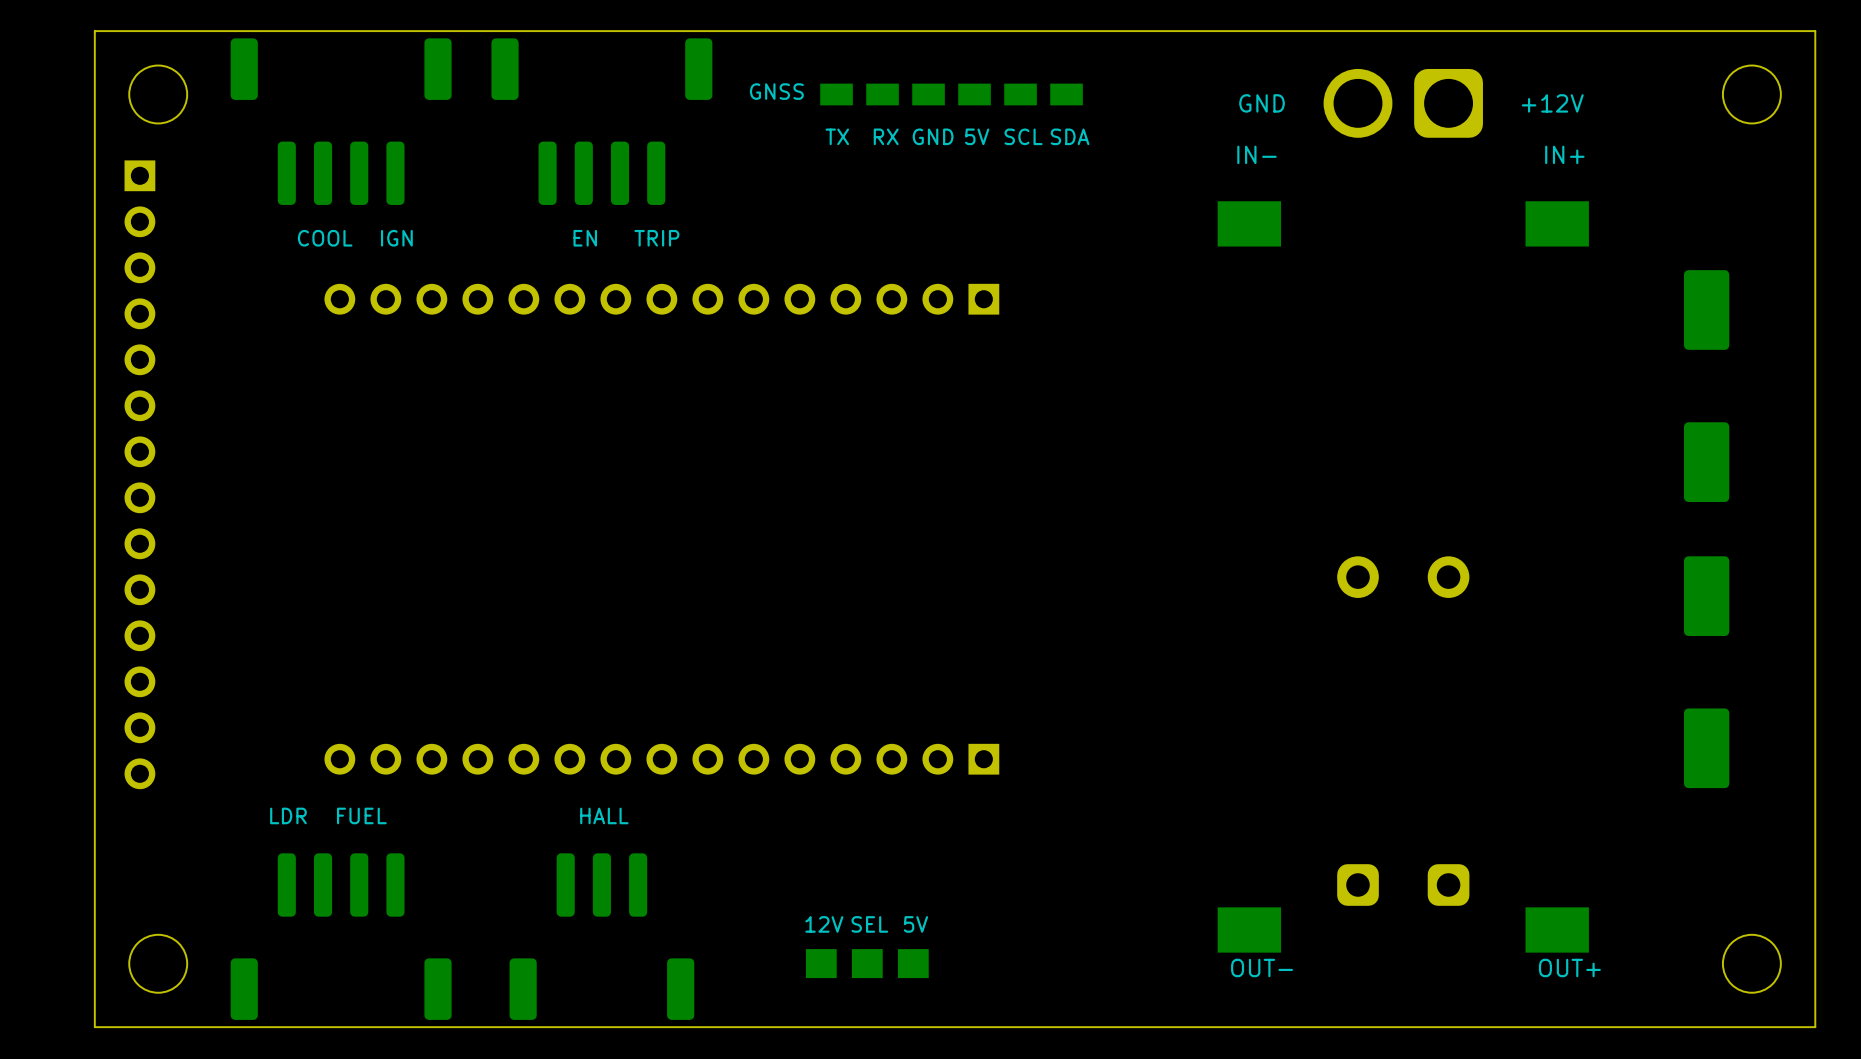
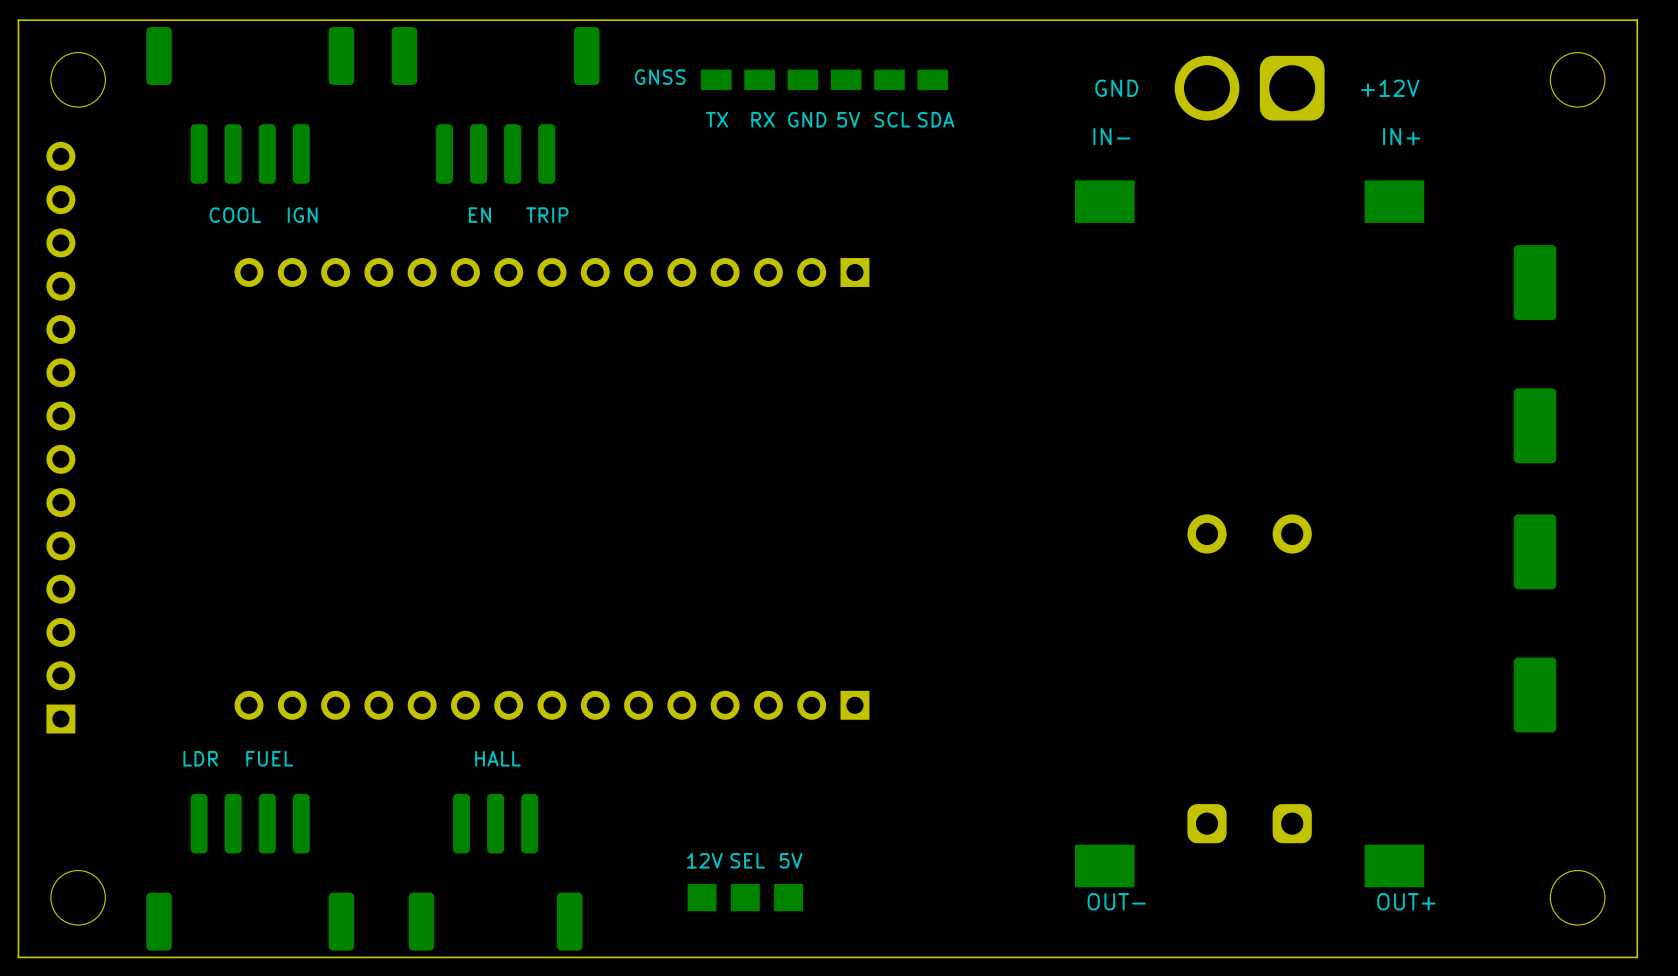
part rotation: 0° (139, 474) -> 180° (60, 437)

